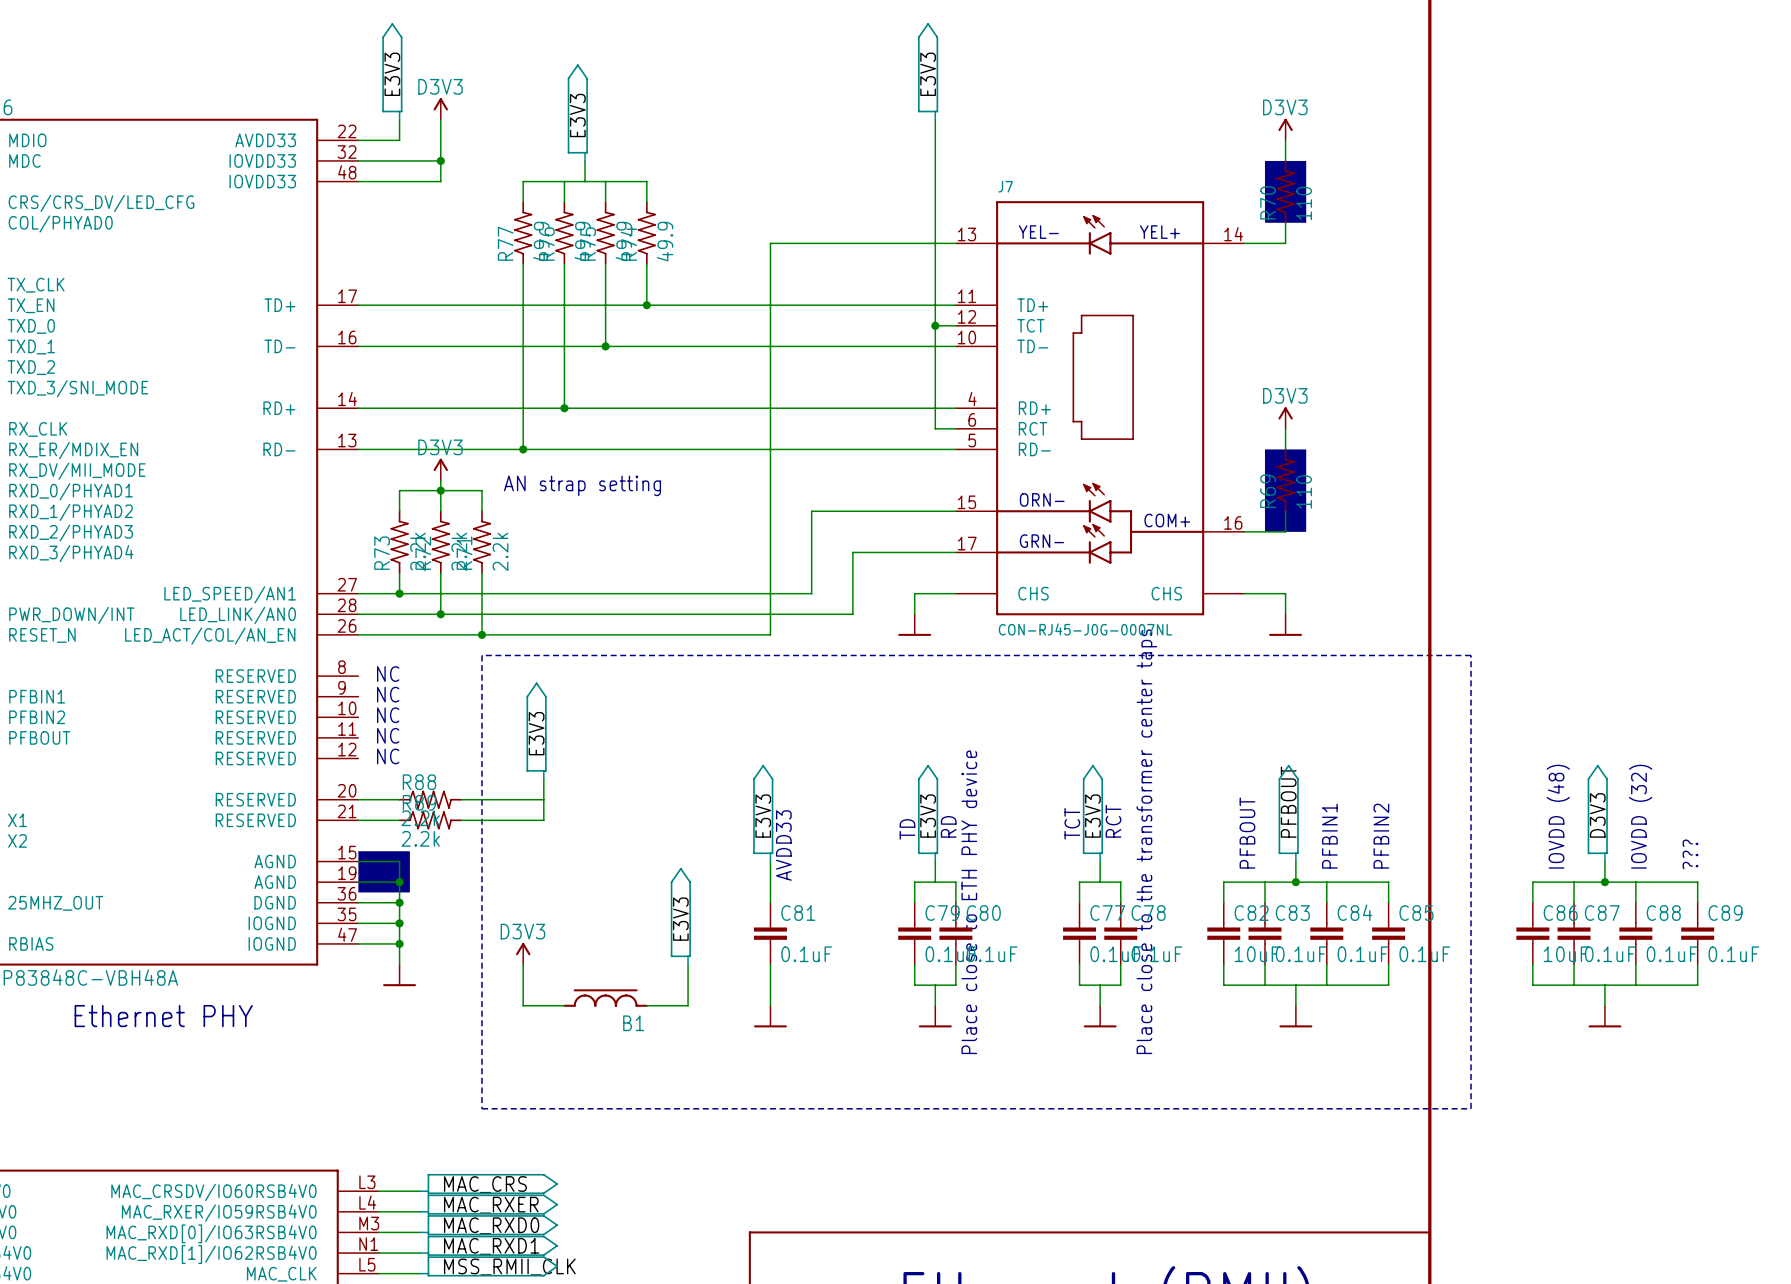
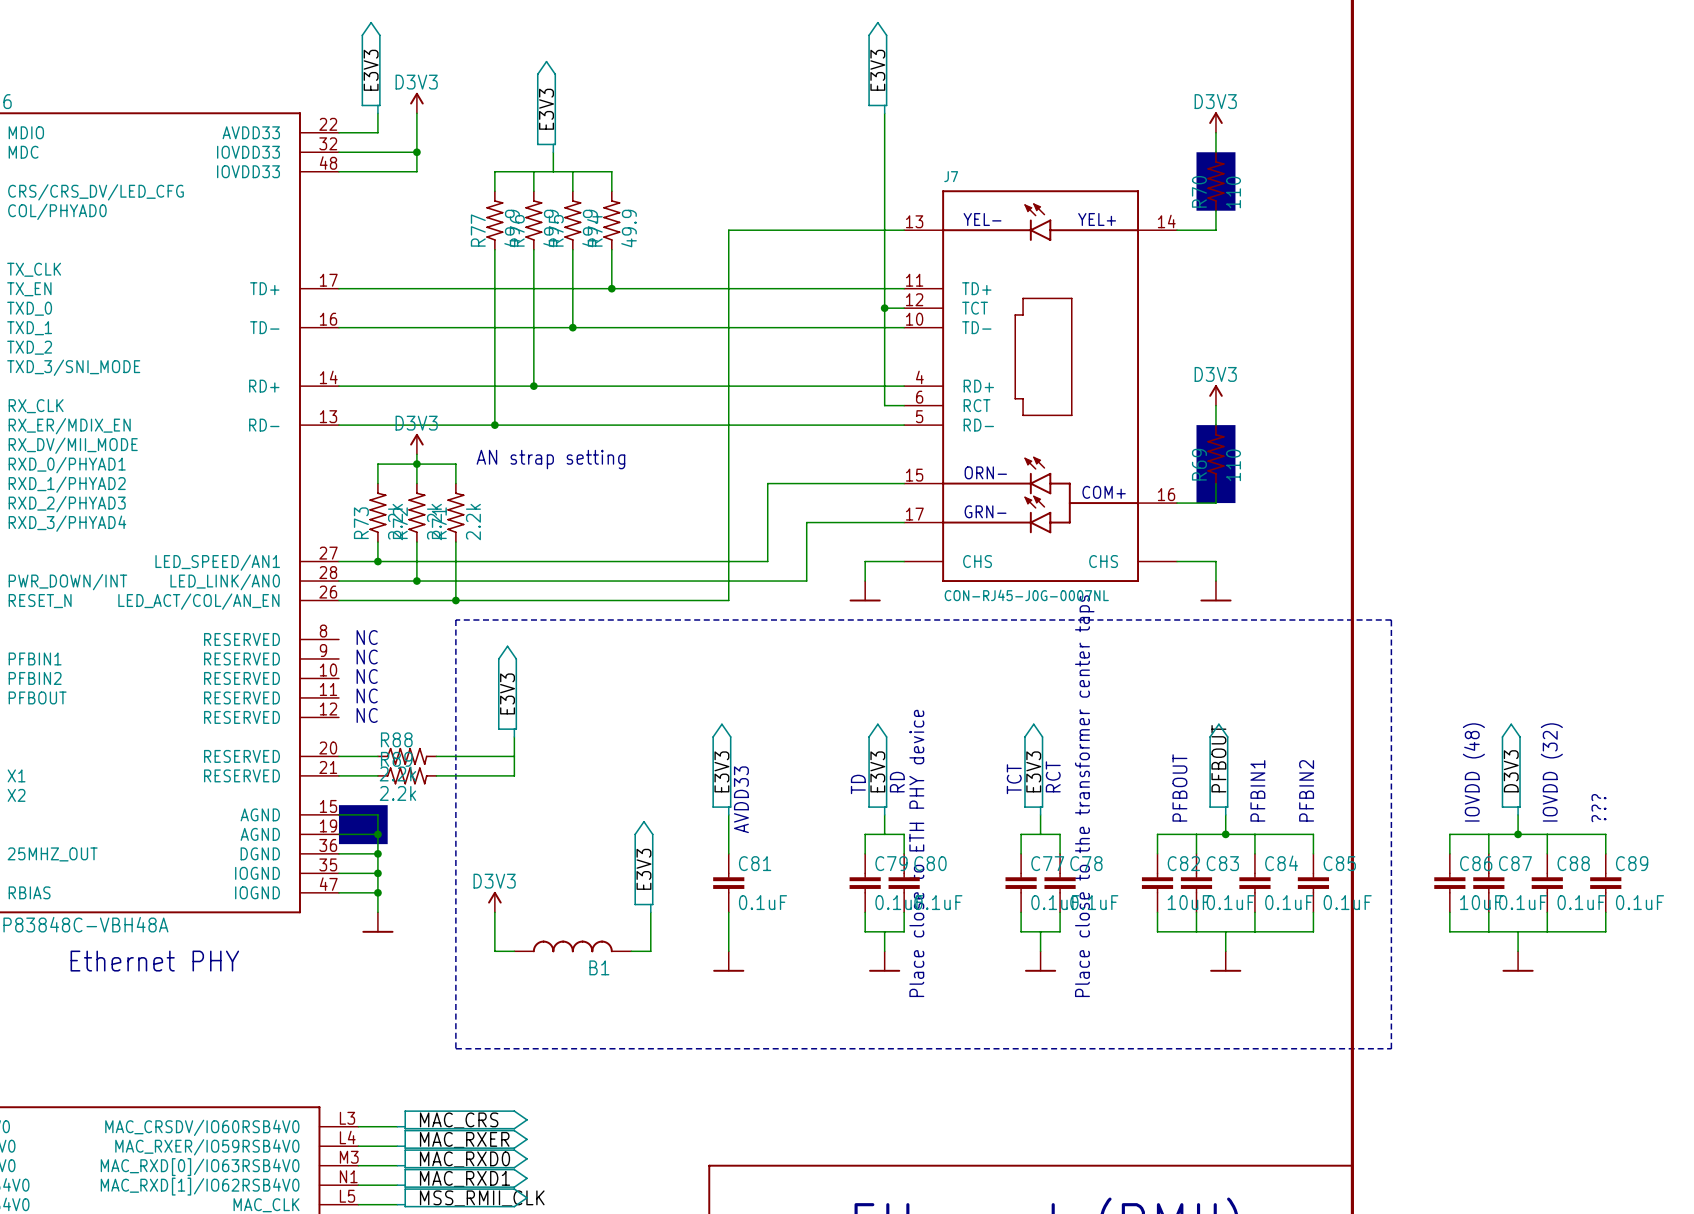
B1 symbol: [563, 989, 648, 1007] -> [514, 940, 632, 953]

